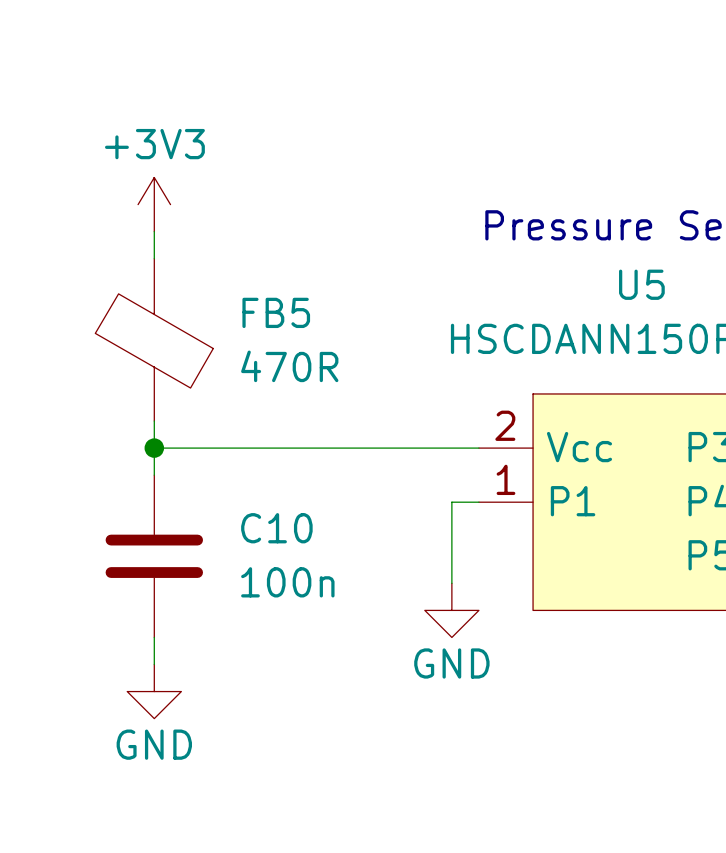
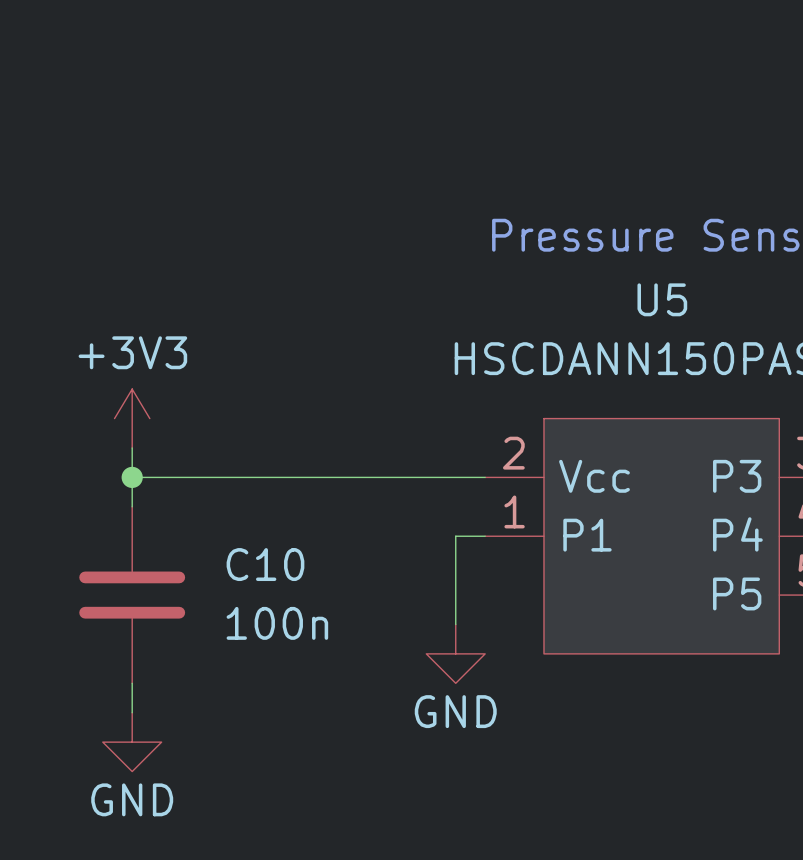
power symbol position: +3V3 (154, 204) -> +3V3 (132, 418)
wire: (154, 231) (154, 258) -> none
FB5: 470R (154, 339) -> none

